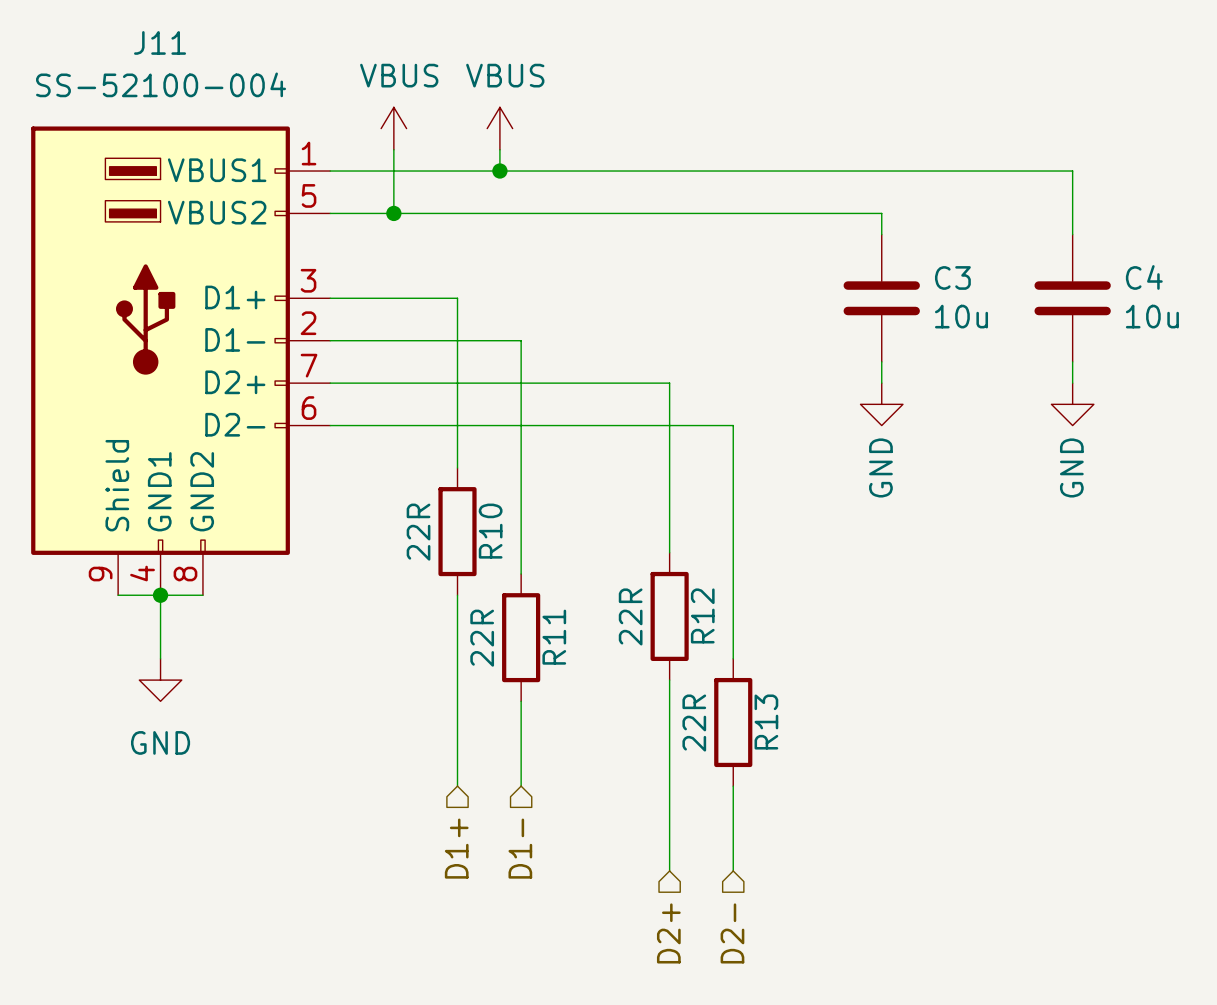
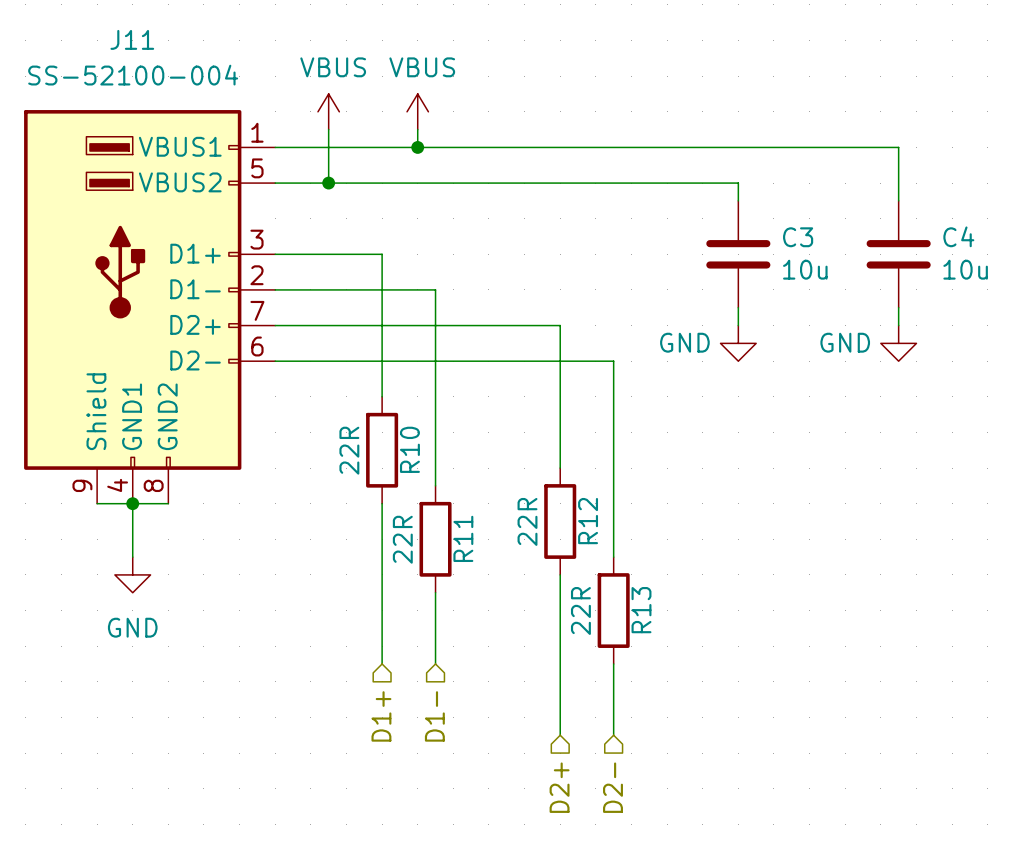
power symbol text rotation: 0° (880, 467) -> 90° clockwise (684, 342)
power symbol text position: GND (880, 467) -> GND (684, 342)
power symbol text rotation: 0° (1071, 467) -> 90° clockwise (845, 342)
power symbol text position: GND (1071, 467) -> GND (845, 342)

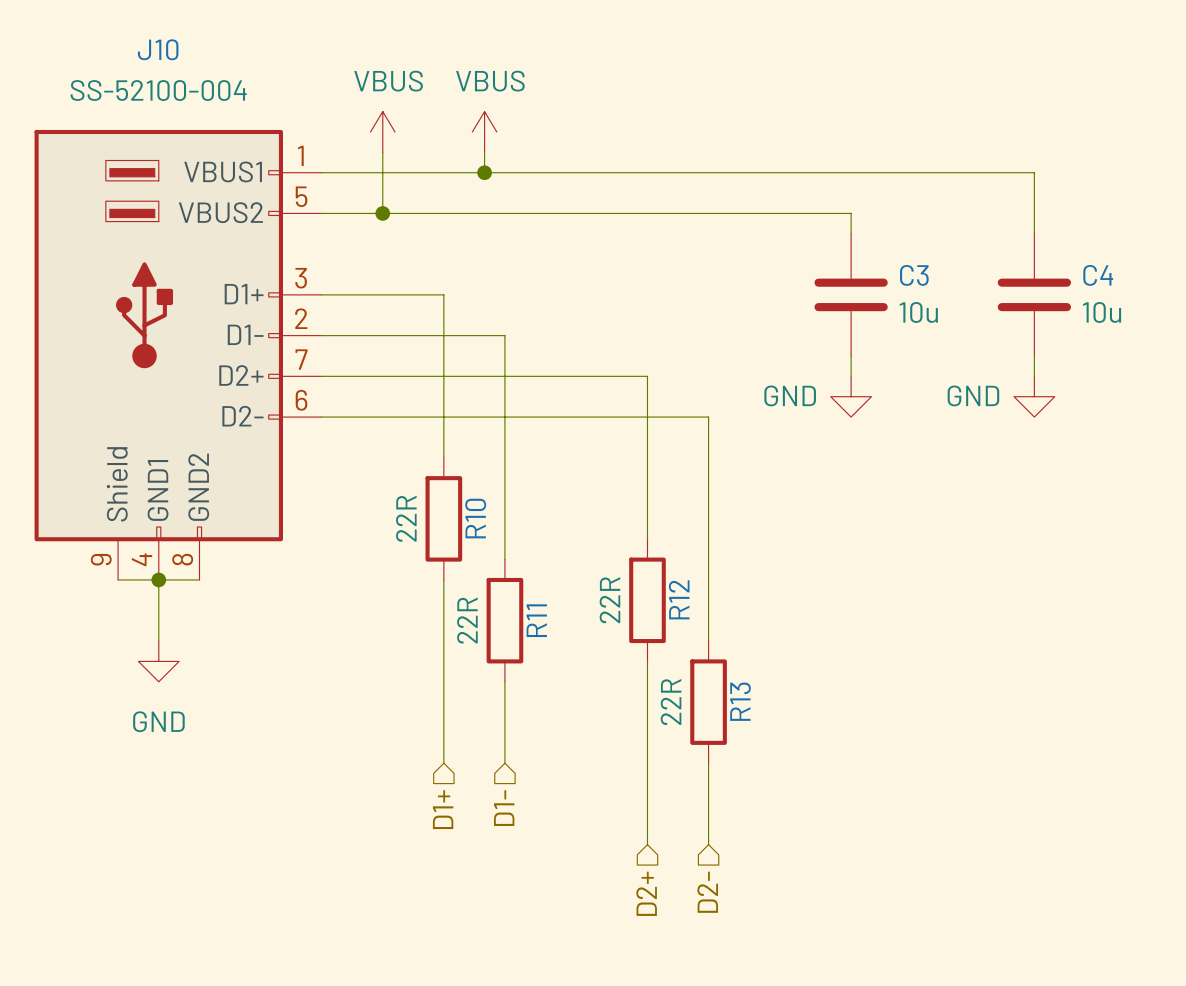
J11 name: J11 (132, 39) -> J10 (158, 49)

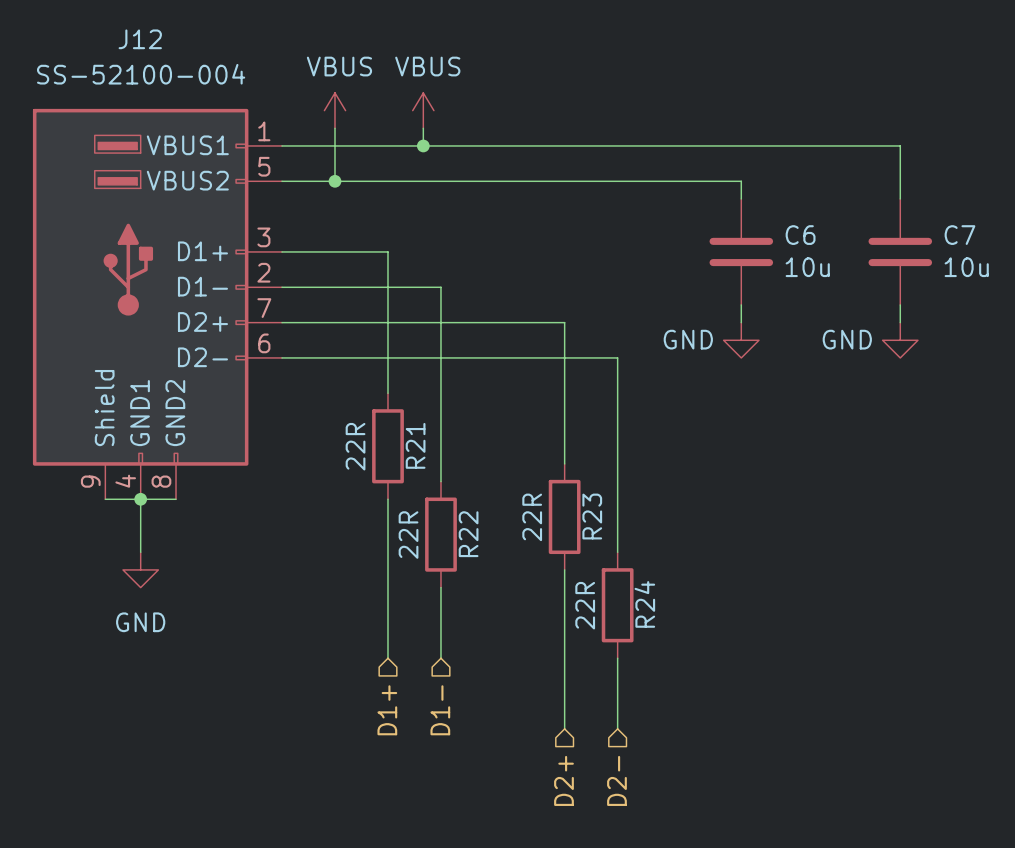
J10 name: J10 (158, 49) -> J12 (140, 39)
C3 name: C3 (914, 275) -> C6 (800, 235)
C4 name: C4 (1098, 275) -> C7 (959, 235)
R10 name: R10 (475, 518) -> R21 (415, 445)
R12 name: R12 (679, 599) -> R23 (592, 516)
R11 name: R11 (536, 620) -> R22 (468, 534)
R13 name: R13 (740, 701) -> R24 (644, 604)

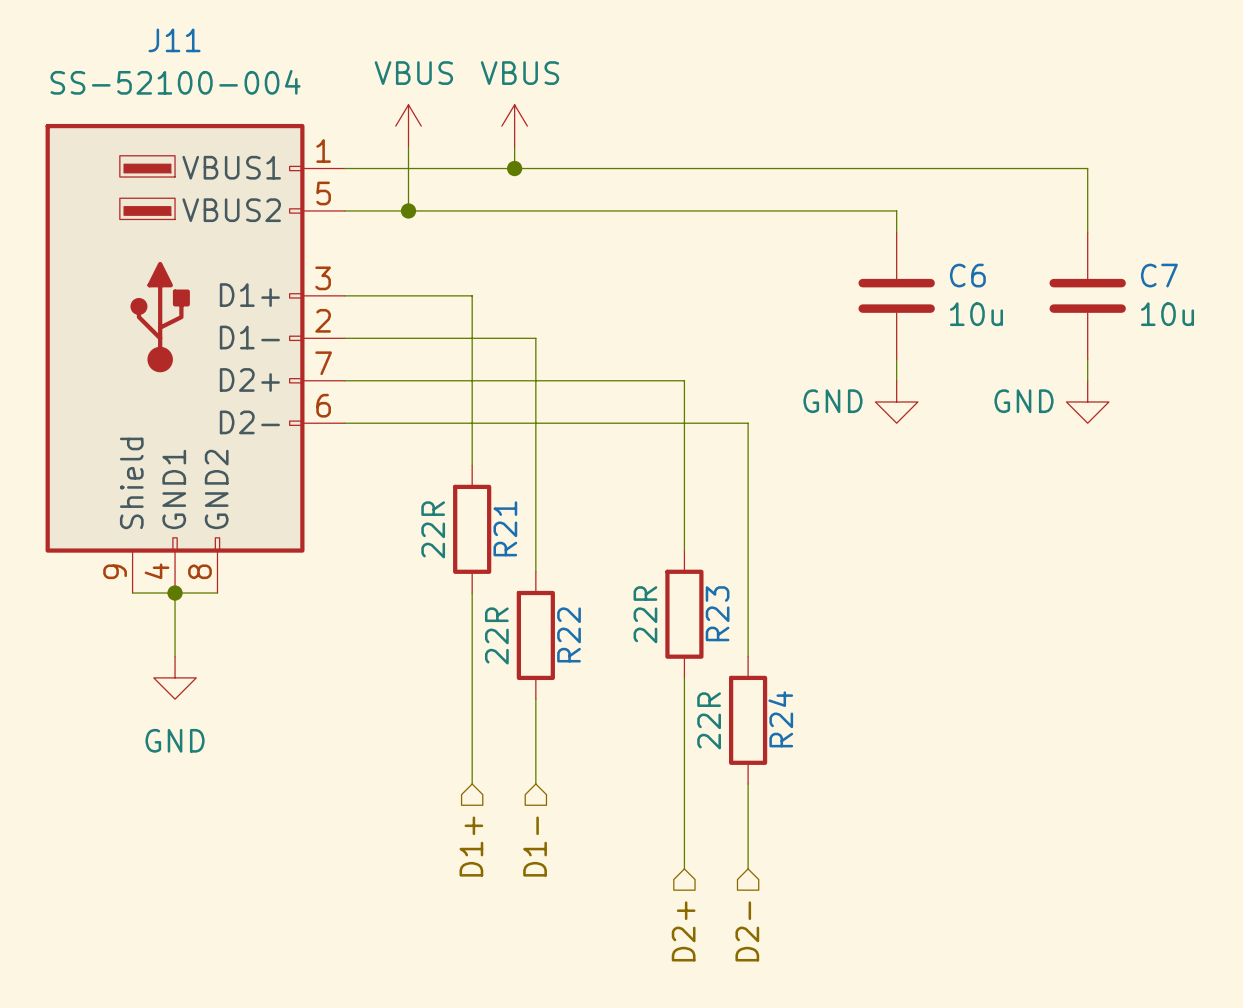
J12 name: J12 (140, 39) -> J11 (174, 40)

